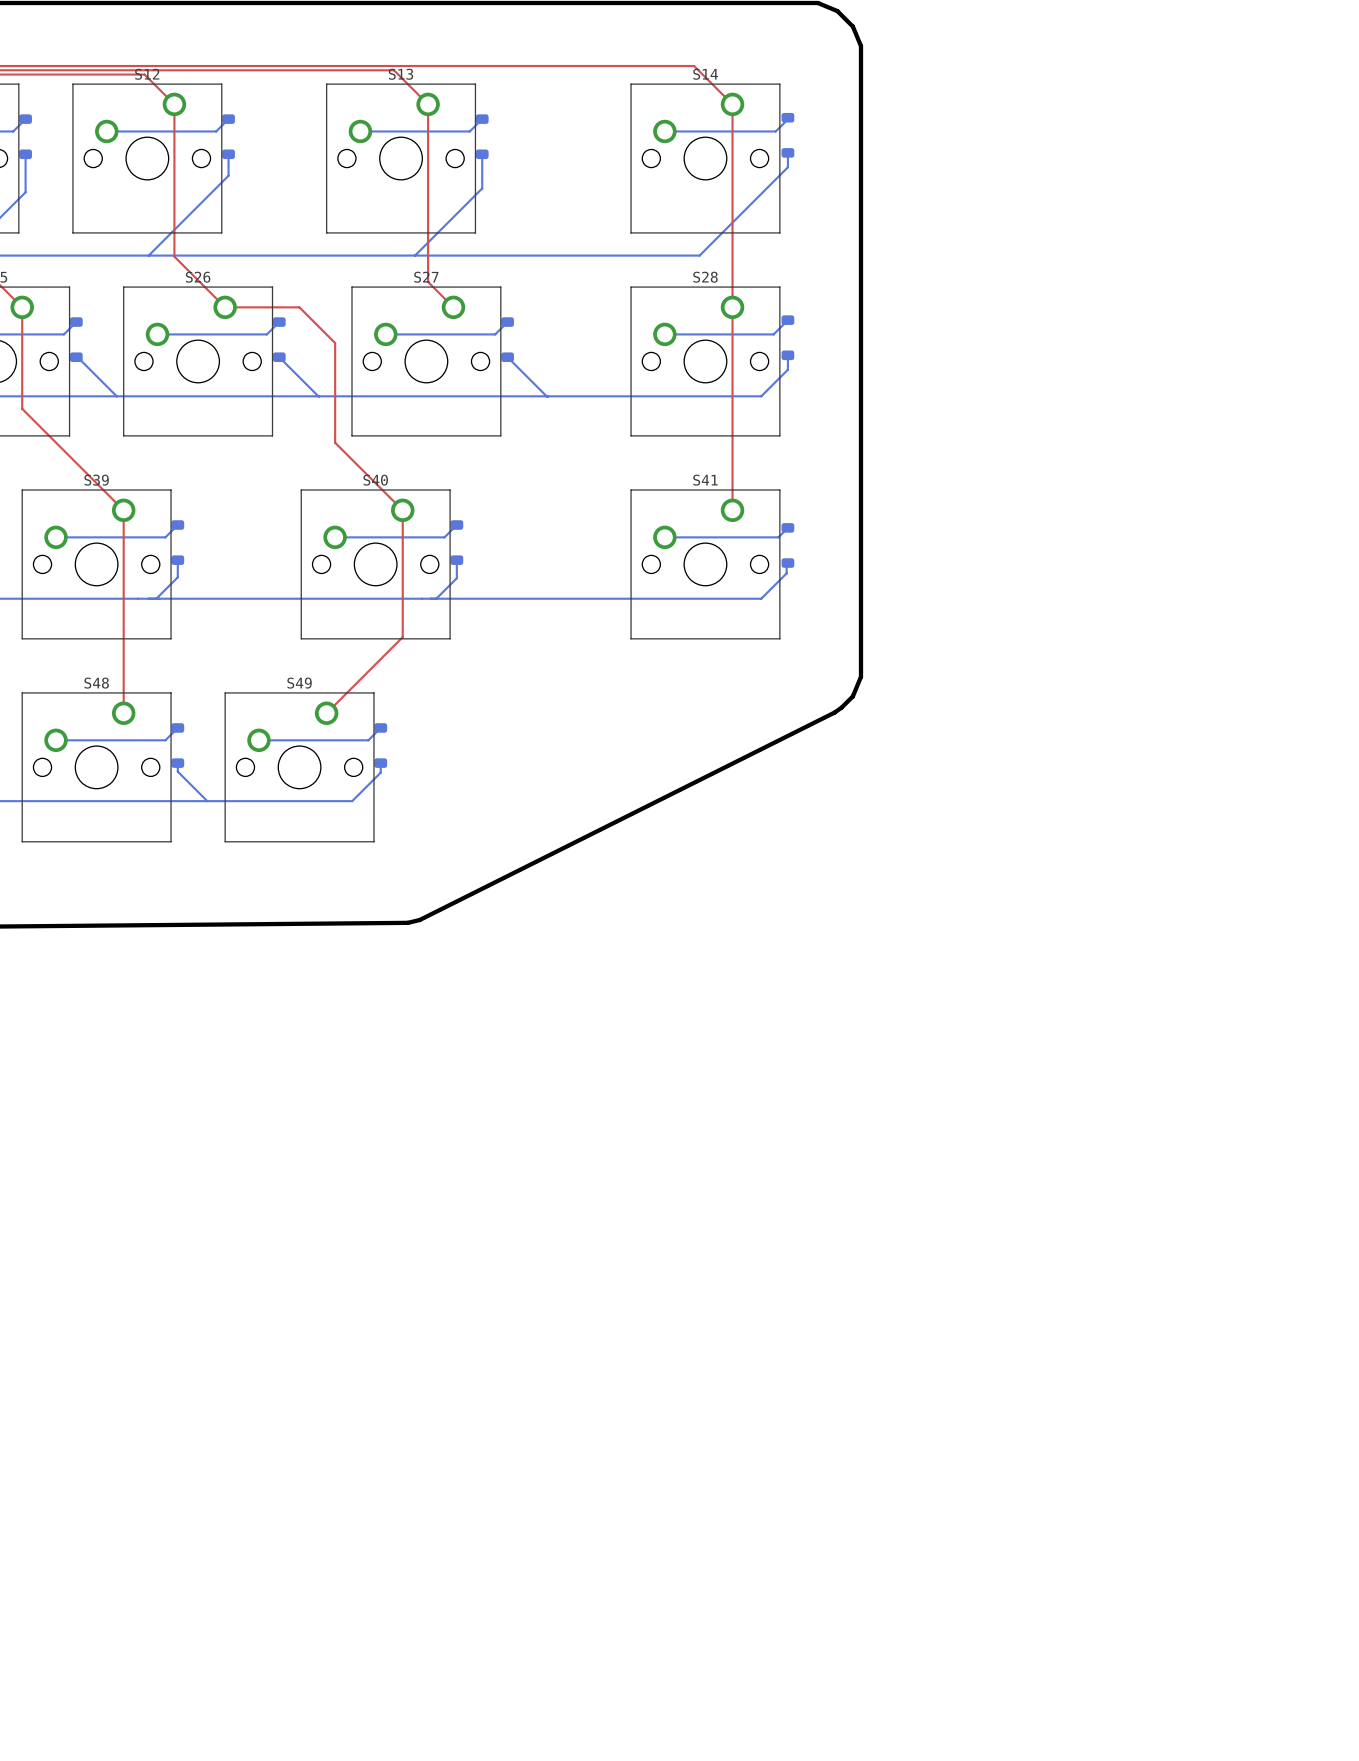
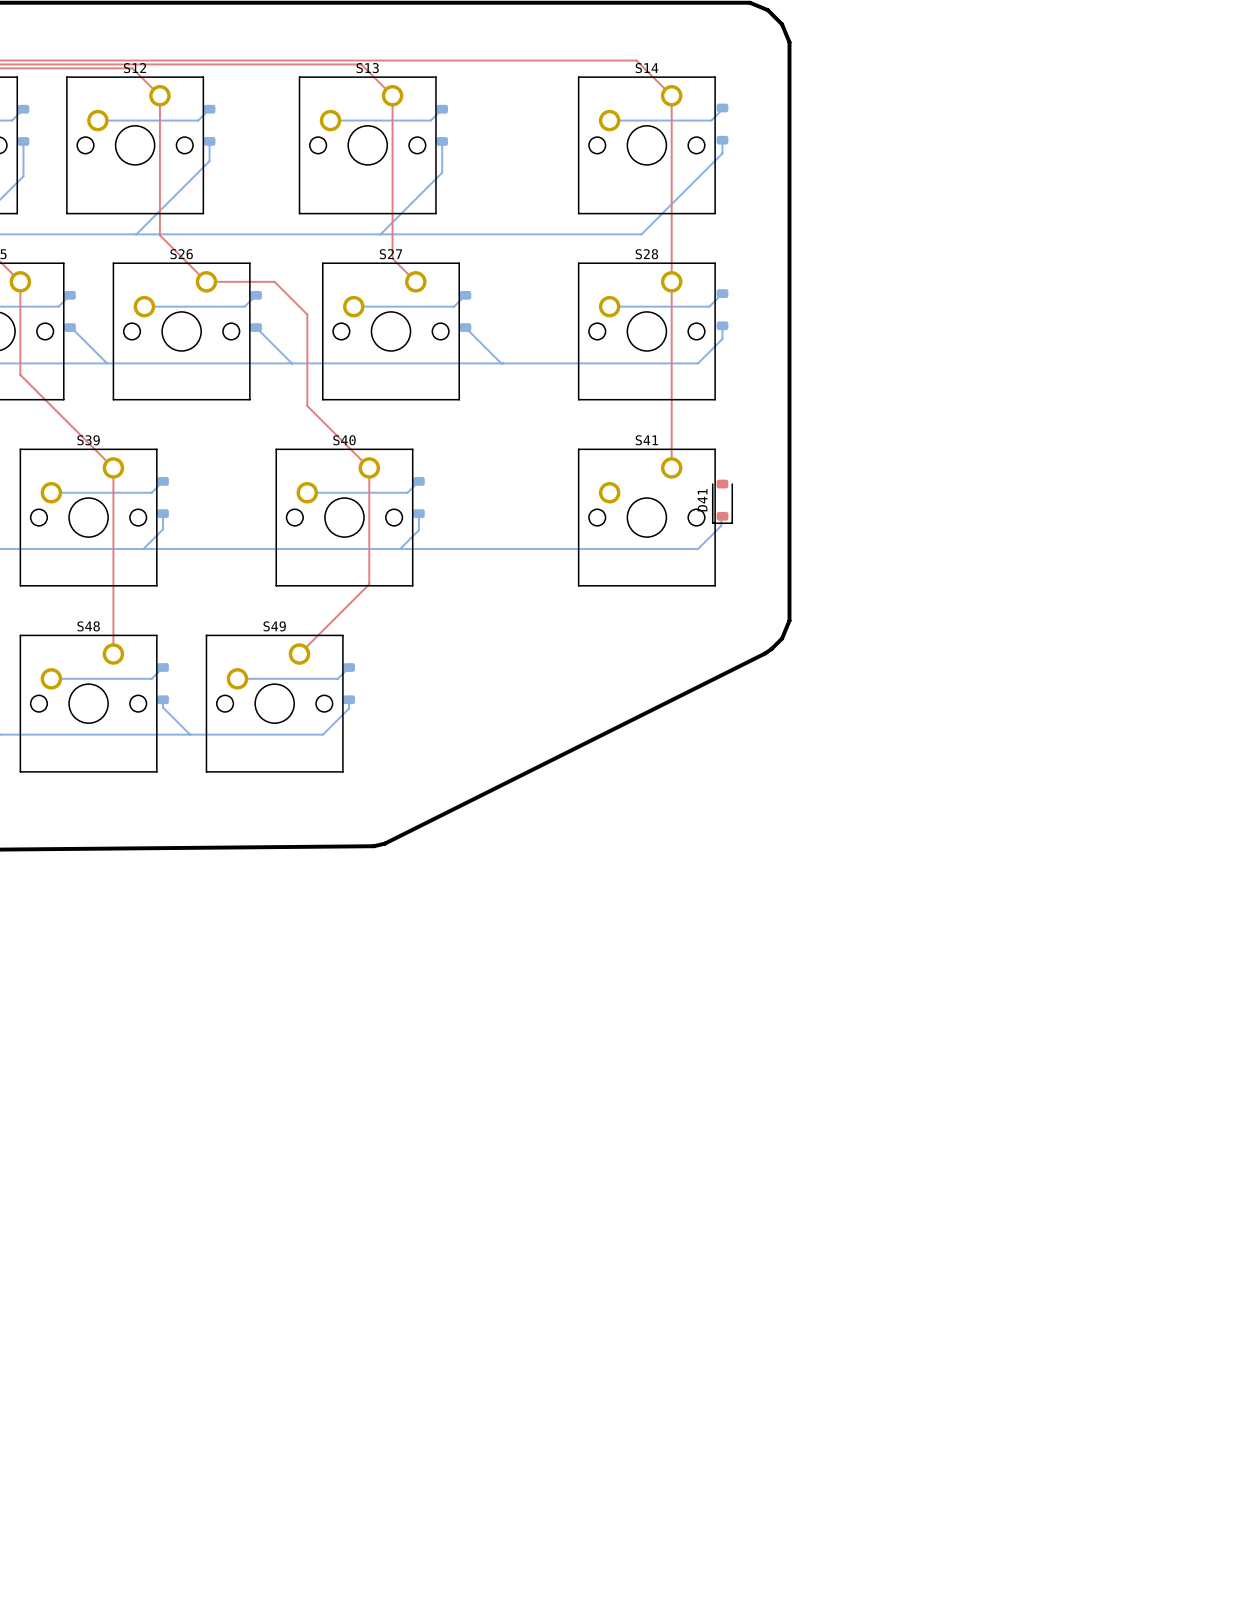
bottom track: (787, 527) (778, 537) (664, 537) -> none
D41 side: bottom (787, 545) -> top (722, 501)

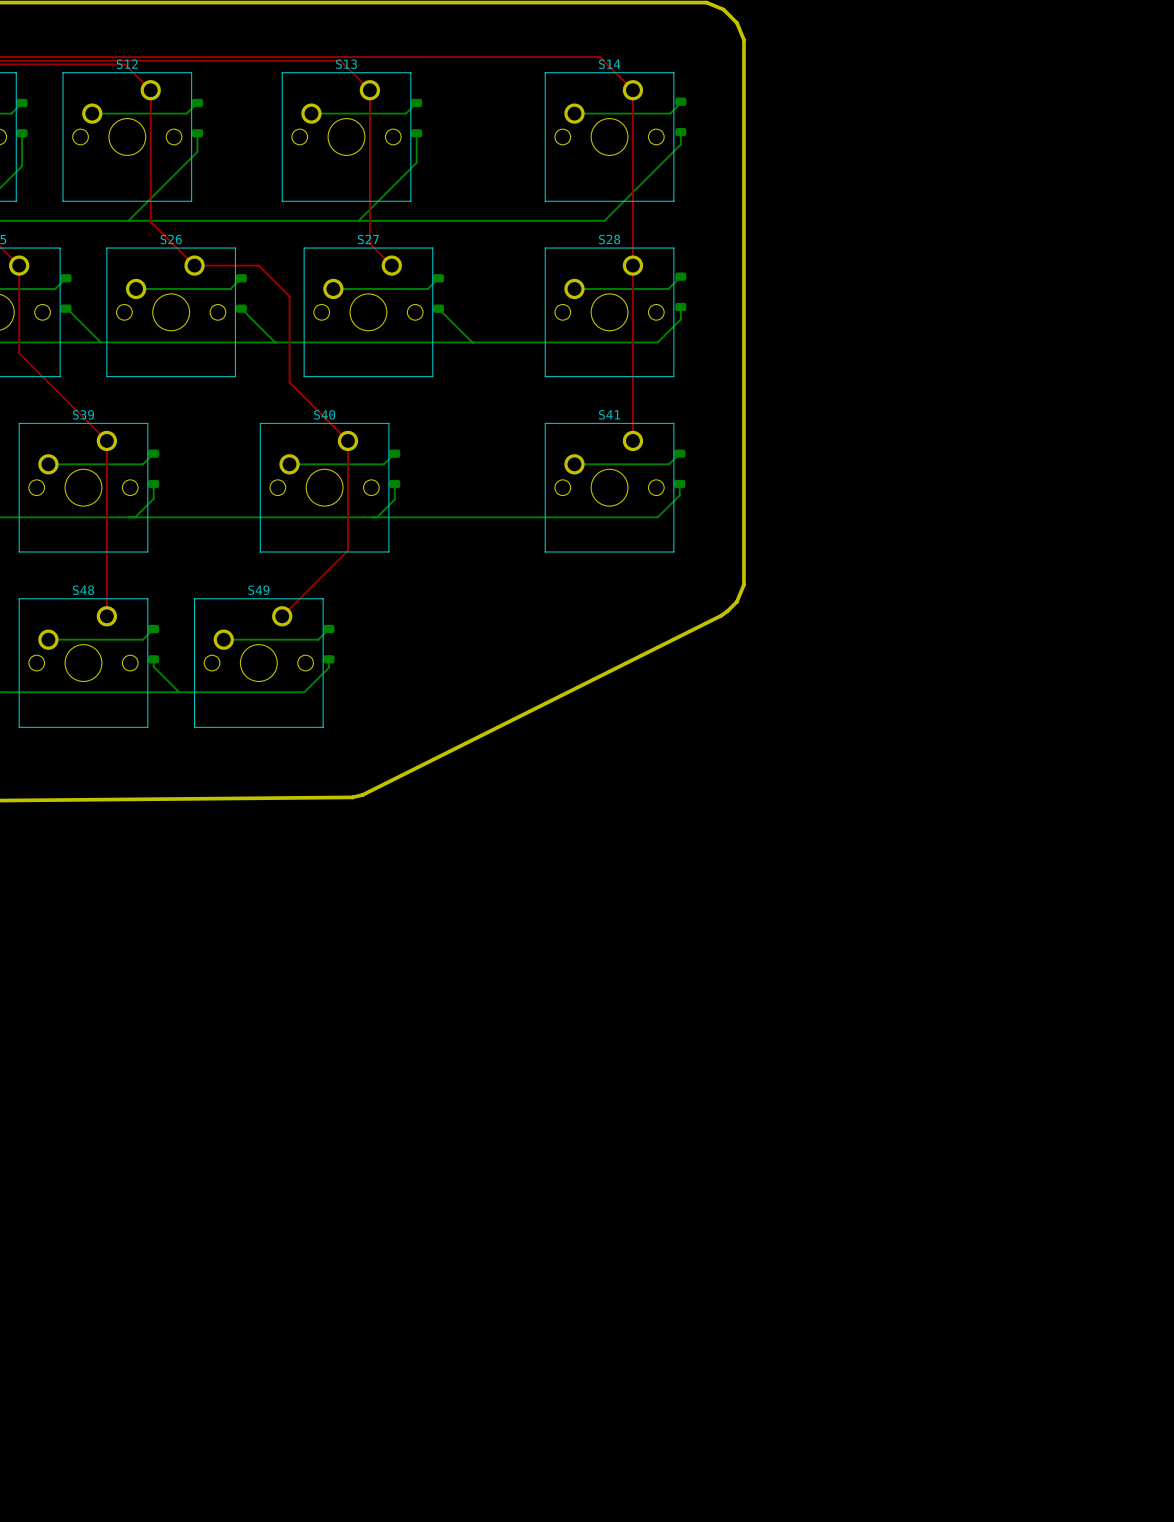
bottom track: none -> (679, 453) (669, 464) (574, 464)
part: none -> (679, 468)
D41: (722, 501) -> none

